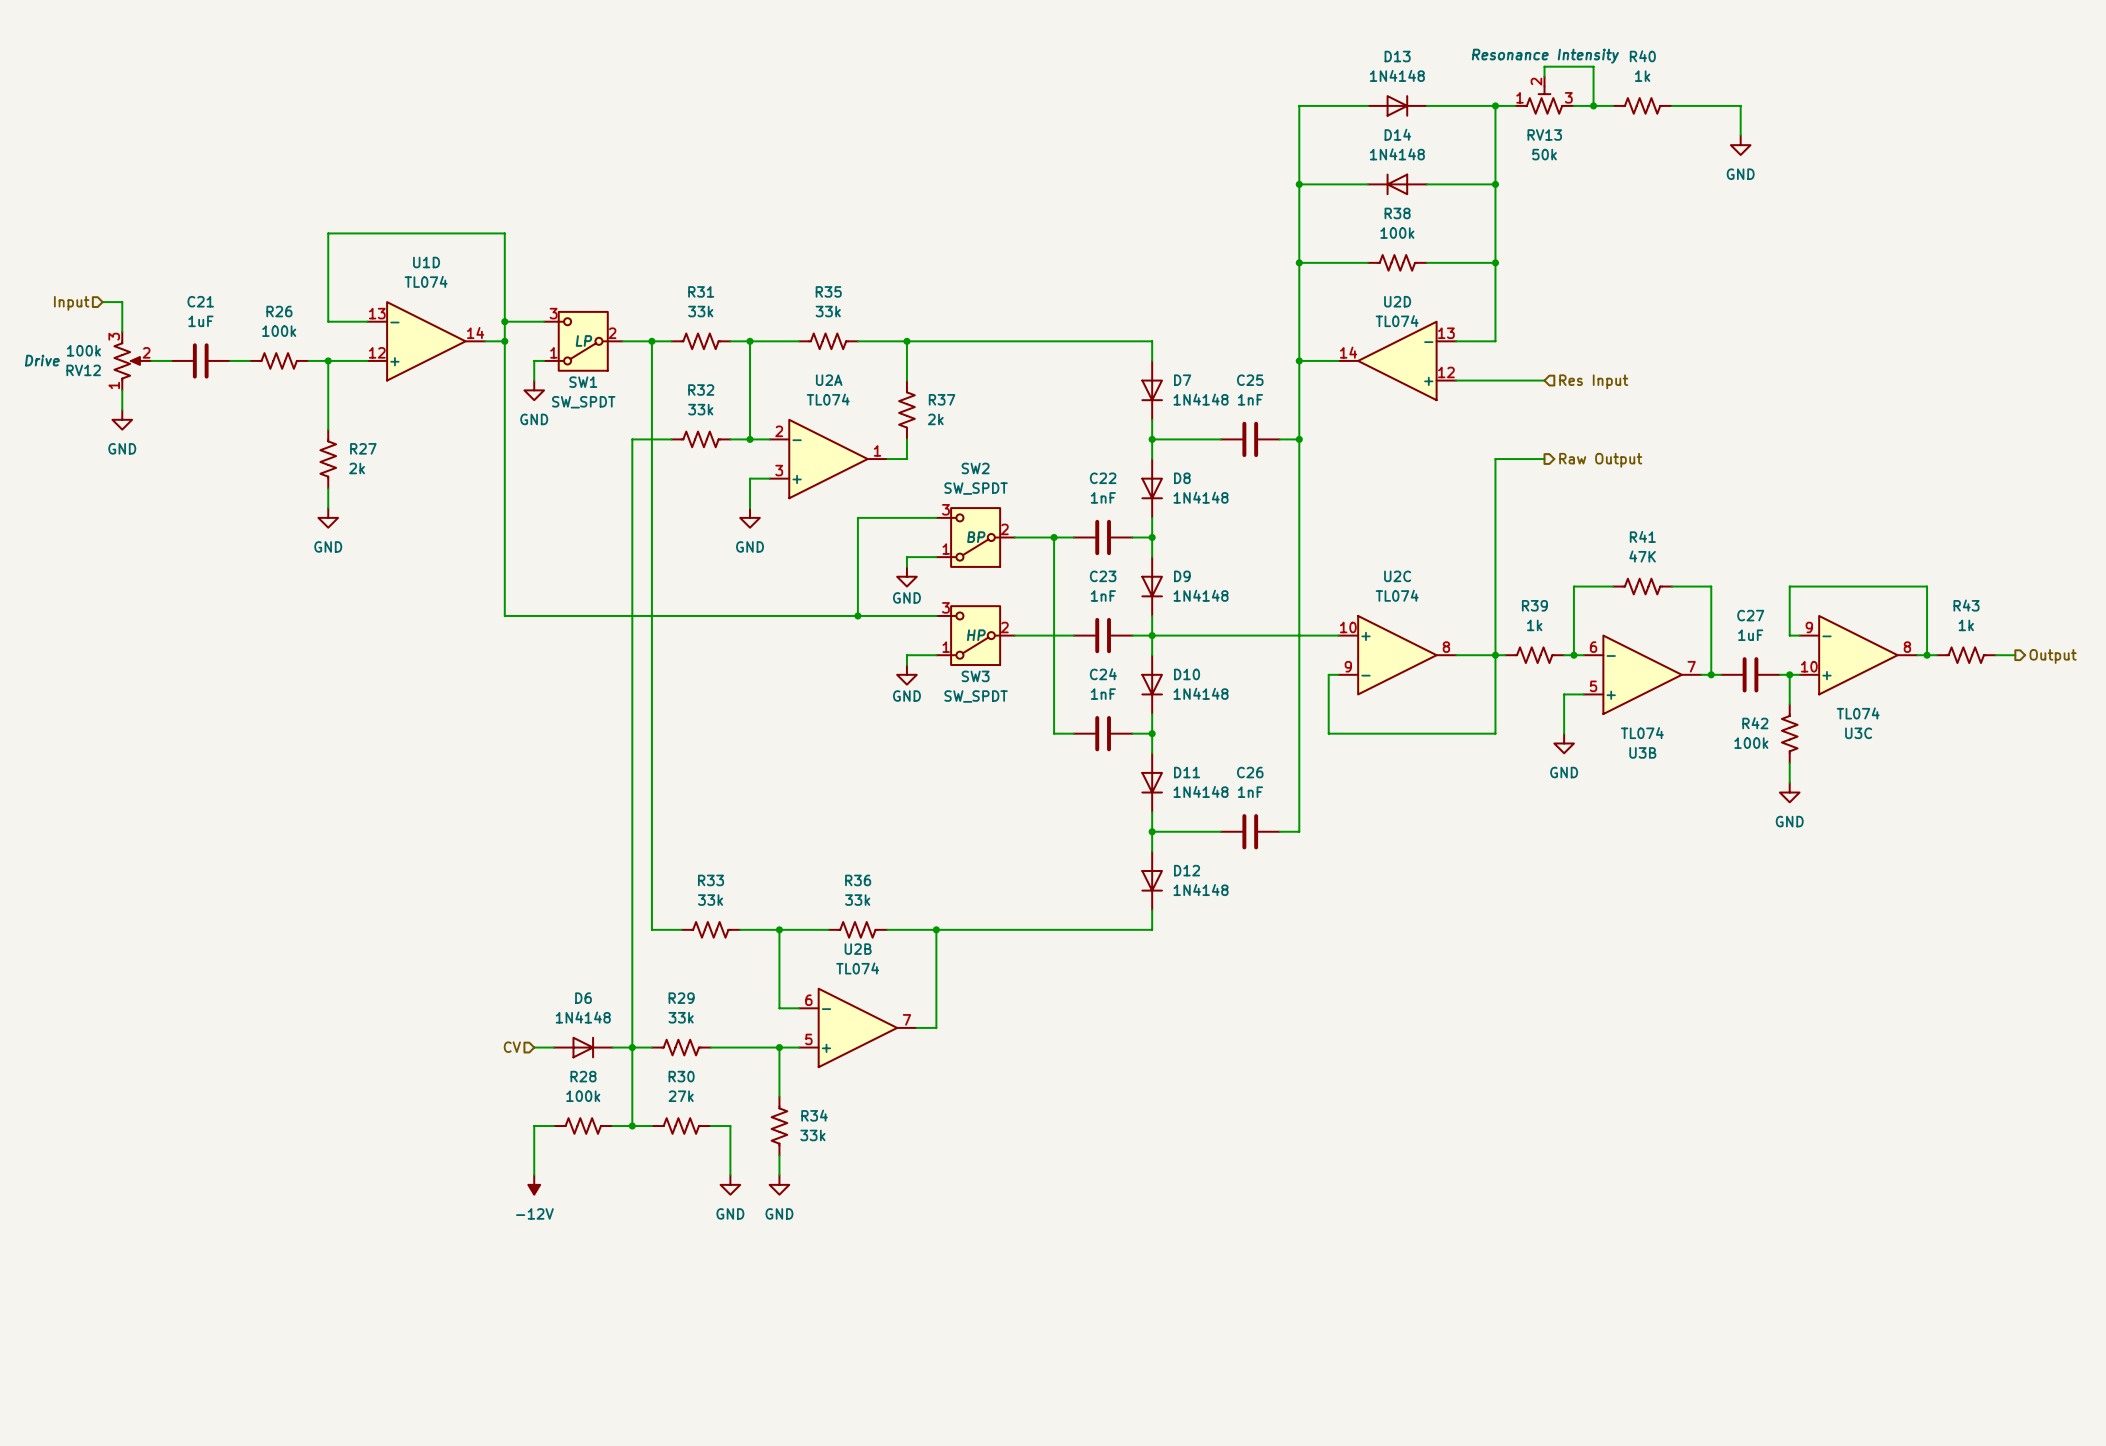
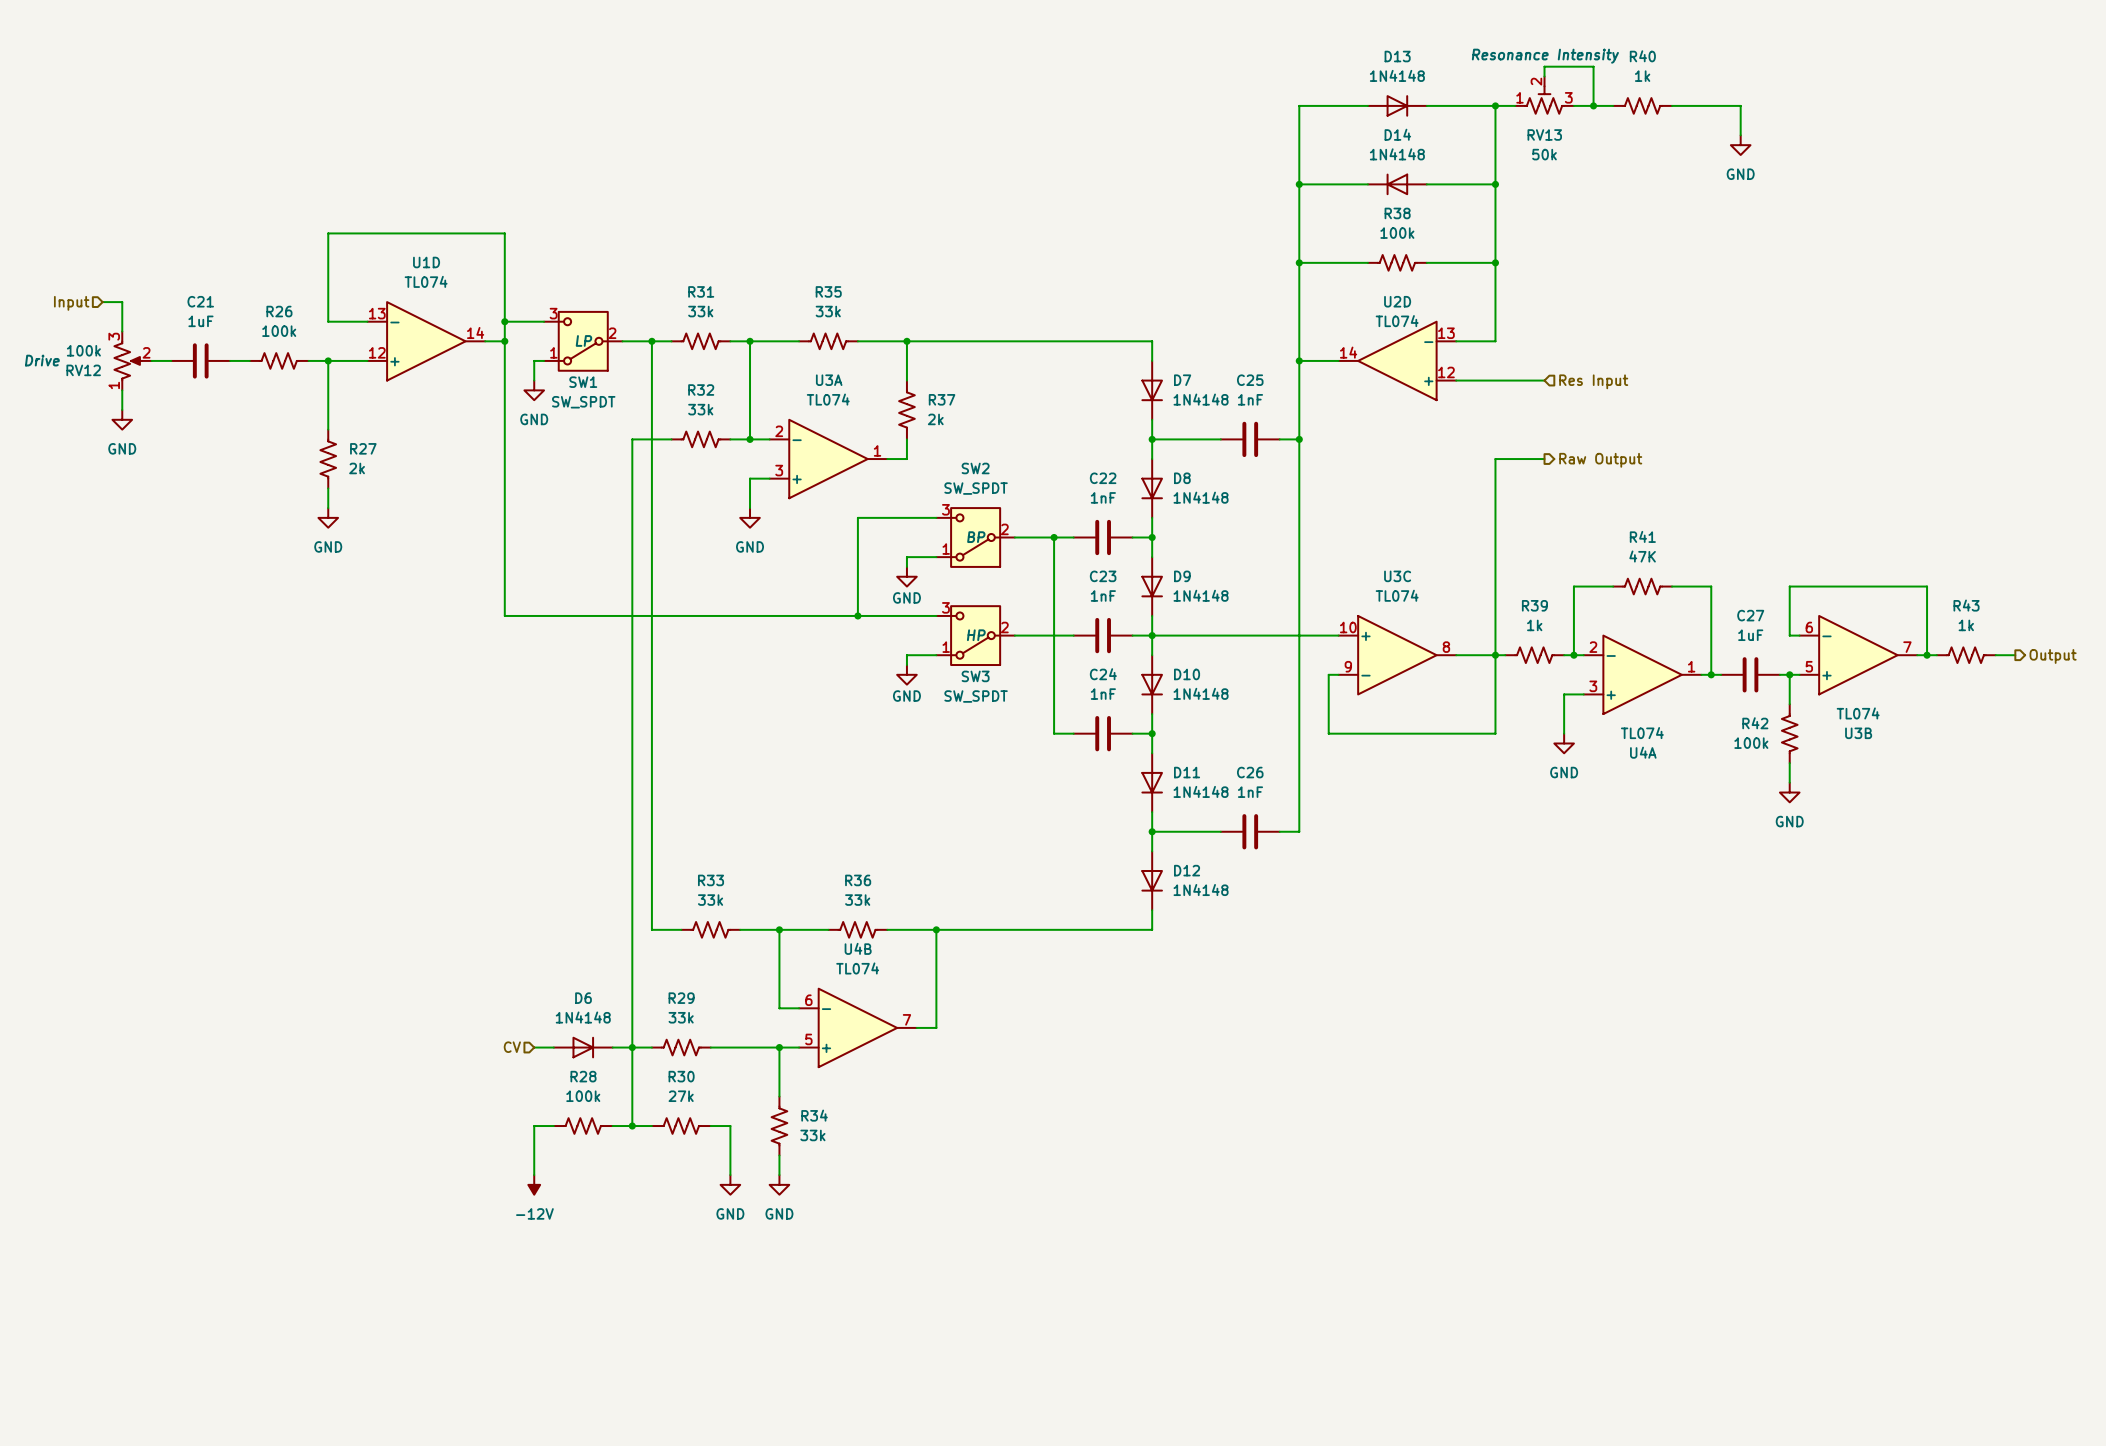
U2A name: U2A (829, 380) -> U3A (829, 380)
U2C name: U2C (1397, 576) -> U3C (1397, 576)
U3C: TL074 (1858, 655) -> none
U3B position: (1642, 674) -> (1858, 655)
U4A: none -> TL074 (1642, 674)
U2B name: U2B (858, 949) -> U4B (858, 948)

